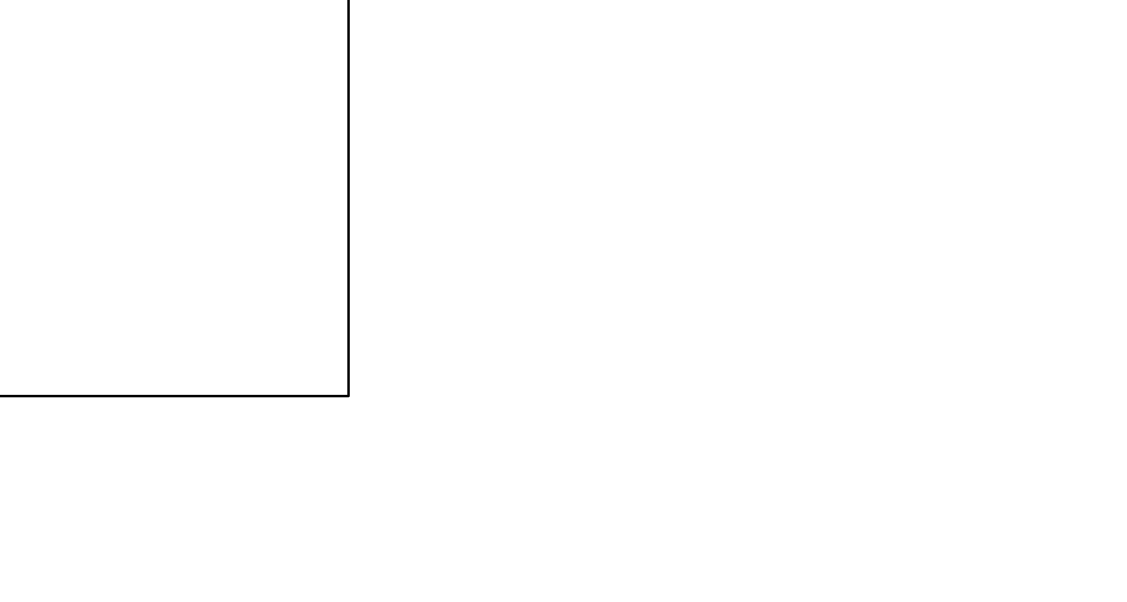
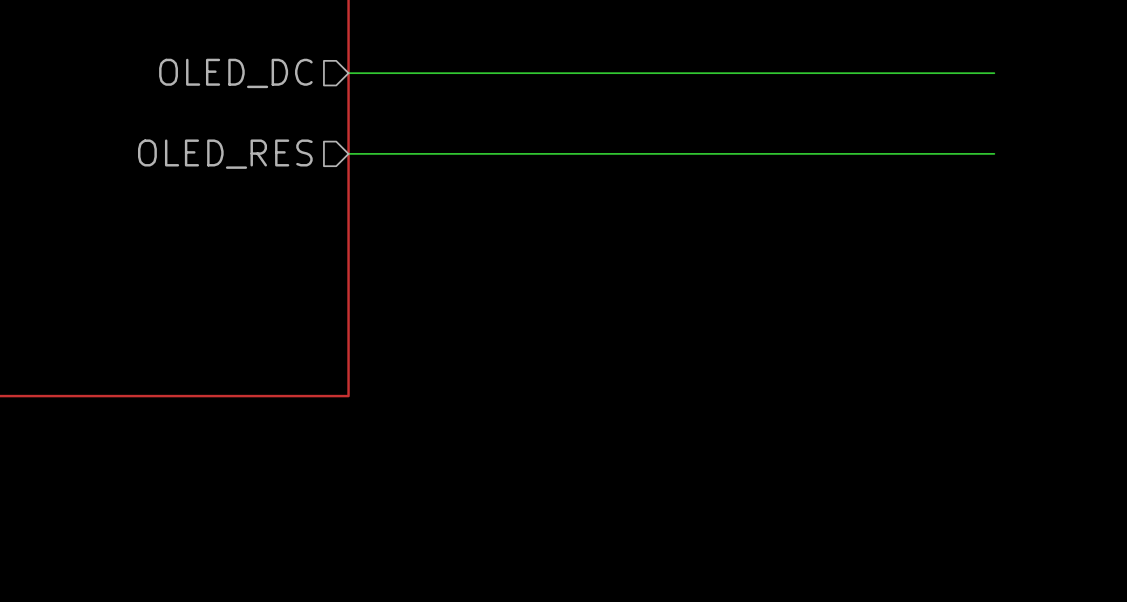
sheet pin: none -> OLED_DC (235, 73)
wire: none -> (348, 73) (994, 73)
wire: none -> (348, 153) (994, 153)
sheet pin: none -> OLED_RES (225, 154)

